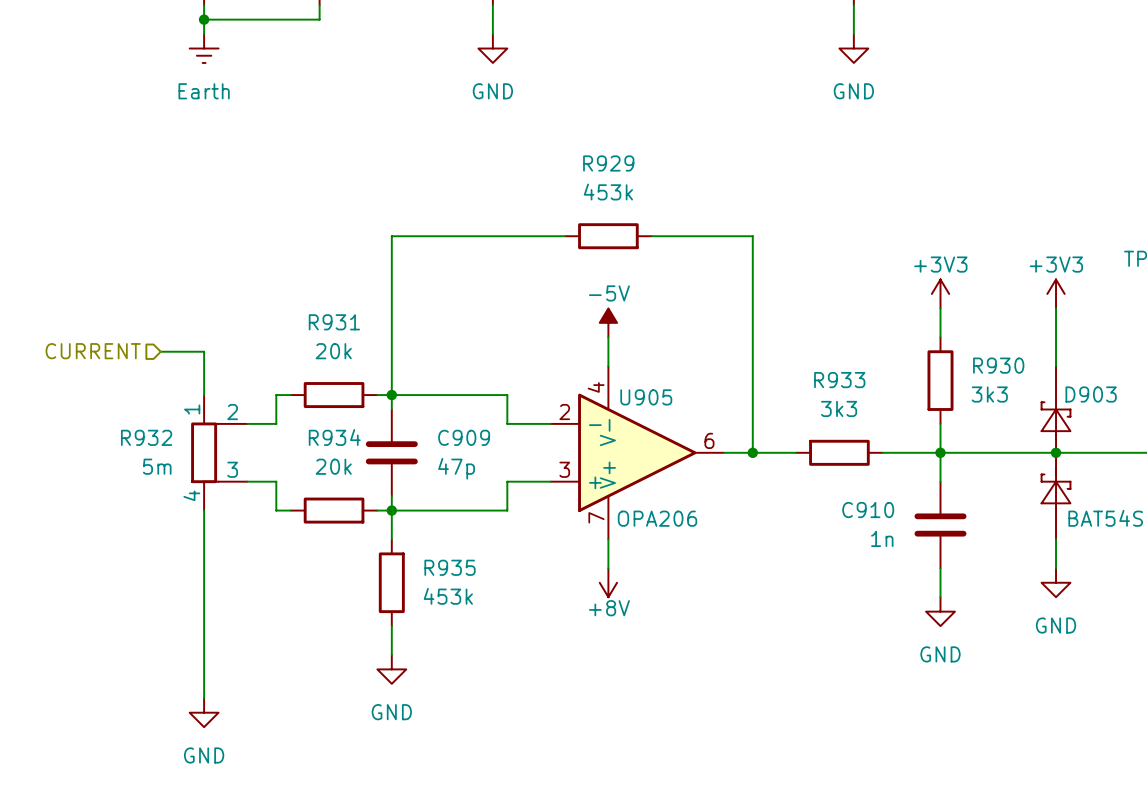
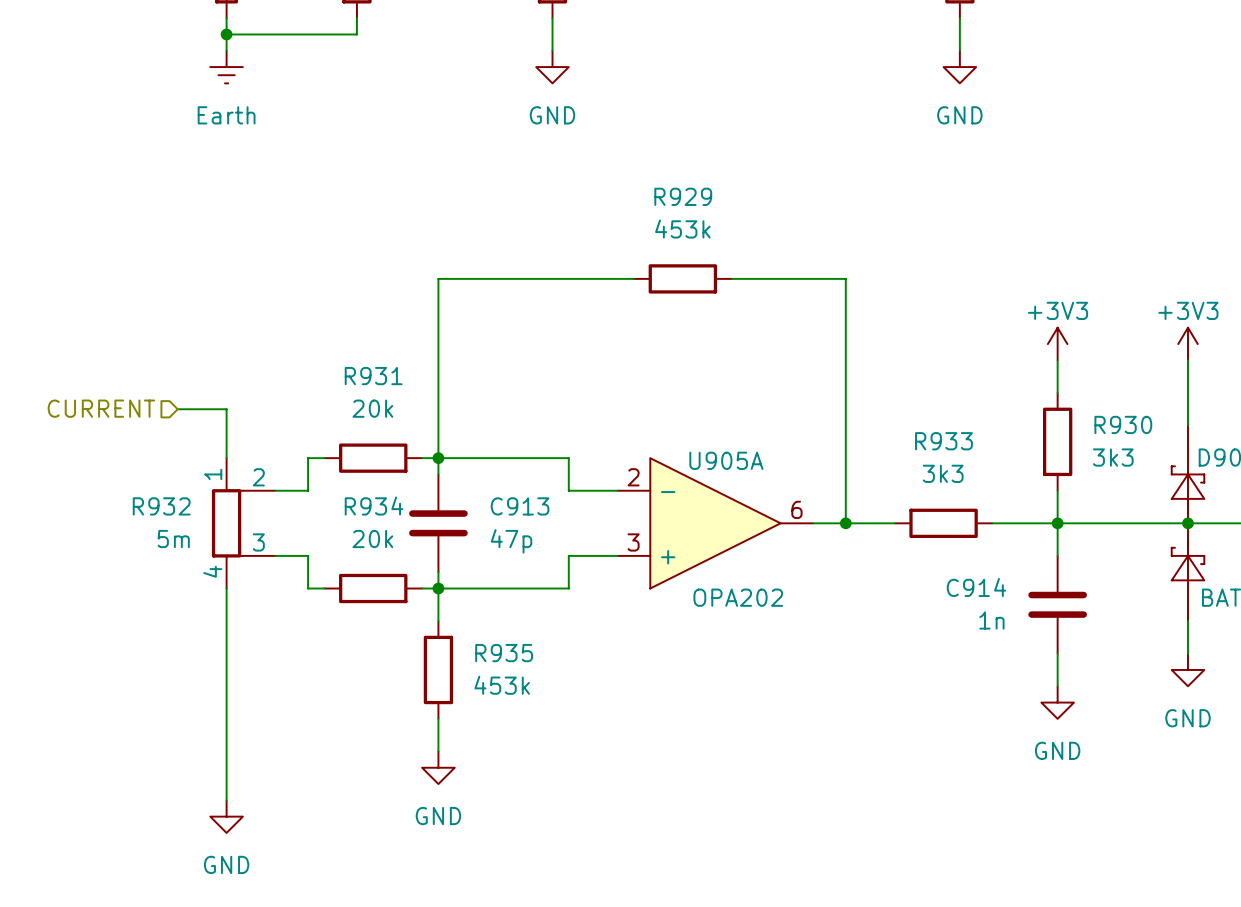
power symbol: -5V (608, 322) -> none
wire: (608, 337) (608, 366) -> none
C909 name: C909 (464, 437) -> C913 (520, 506)
U905: OPA206 (637, 452) -> none
U905A: none -> OPA202 (715, 523)
C910 name: C910 (868, 510) -> C914 (976, 587)
wire: (608, 539) (608, 568) -> none
power symbol: +8V (608, 582) -> none

